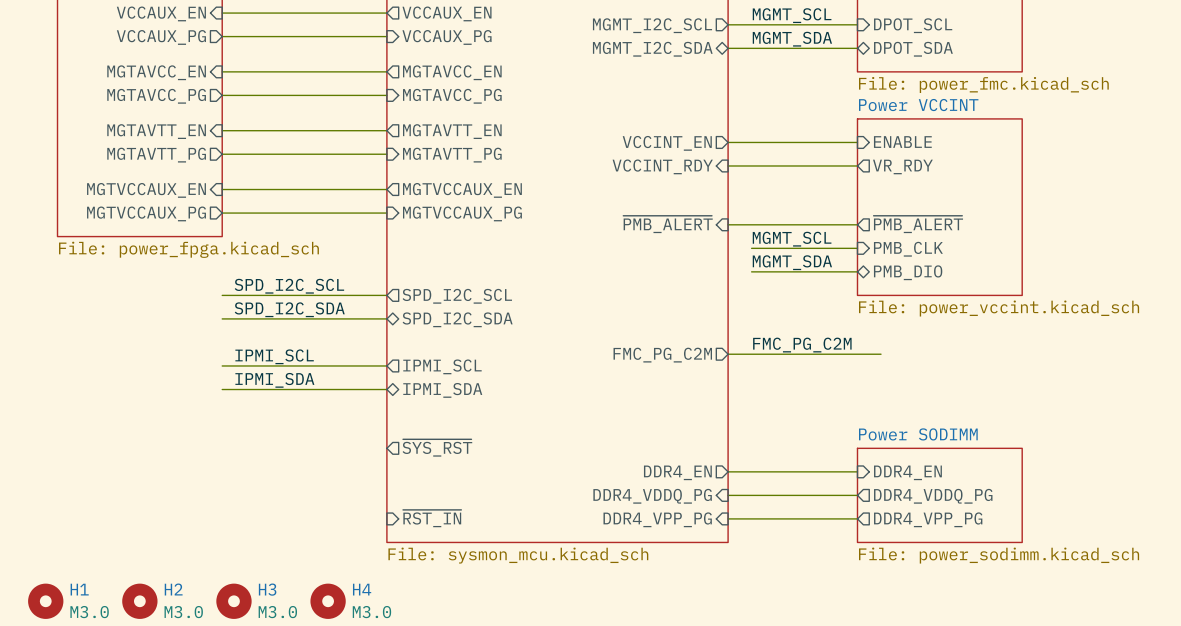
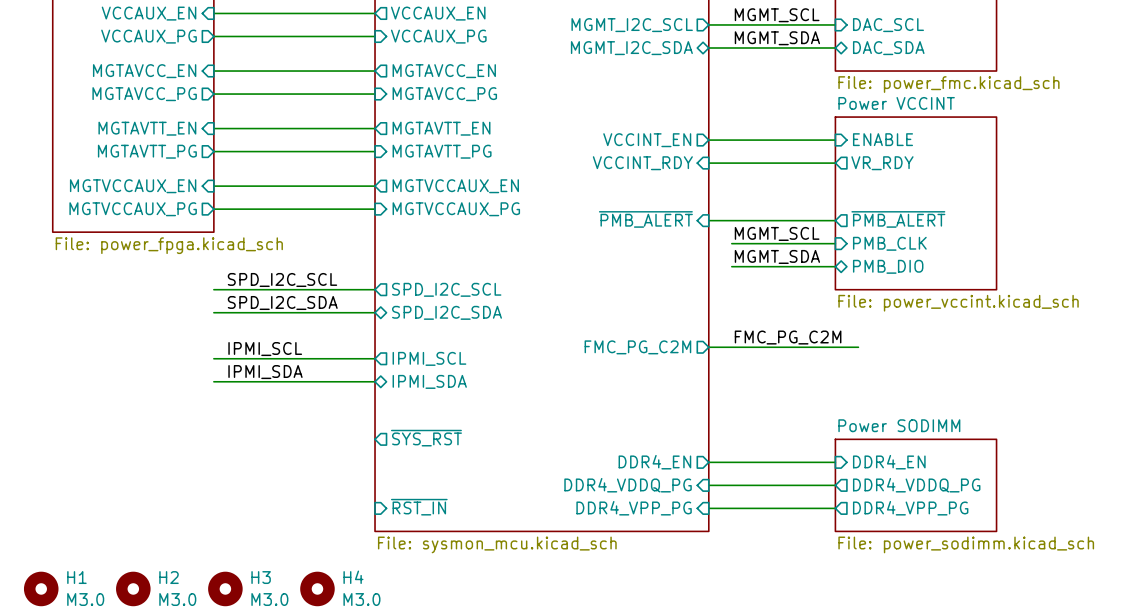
sheet pin: DPOT_SCL (913, 25) -> DAC_SCL (888, 25)
sheet pin: DPOT_SDA (913, 49) -> DAC_SDA (888, 48)

